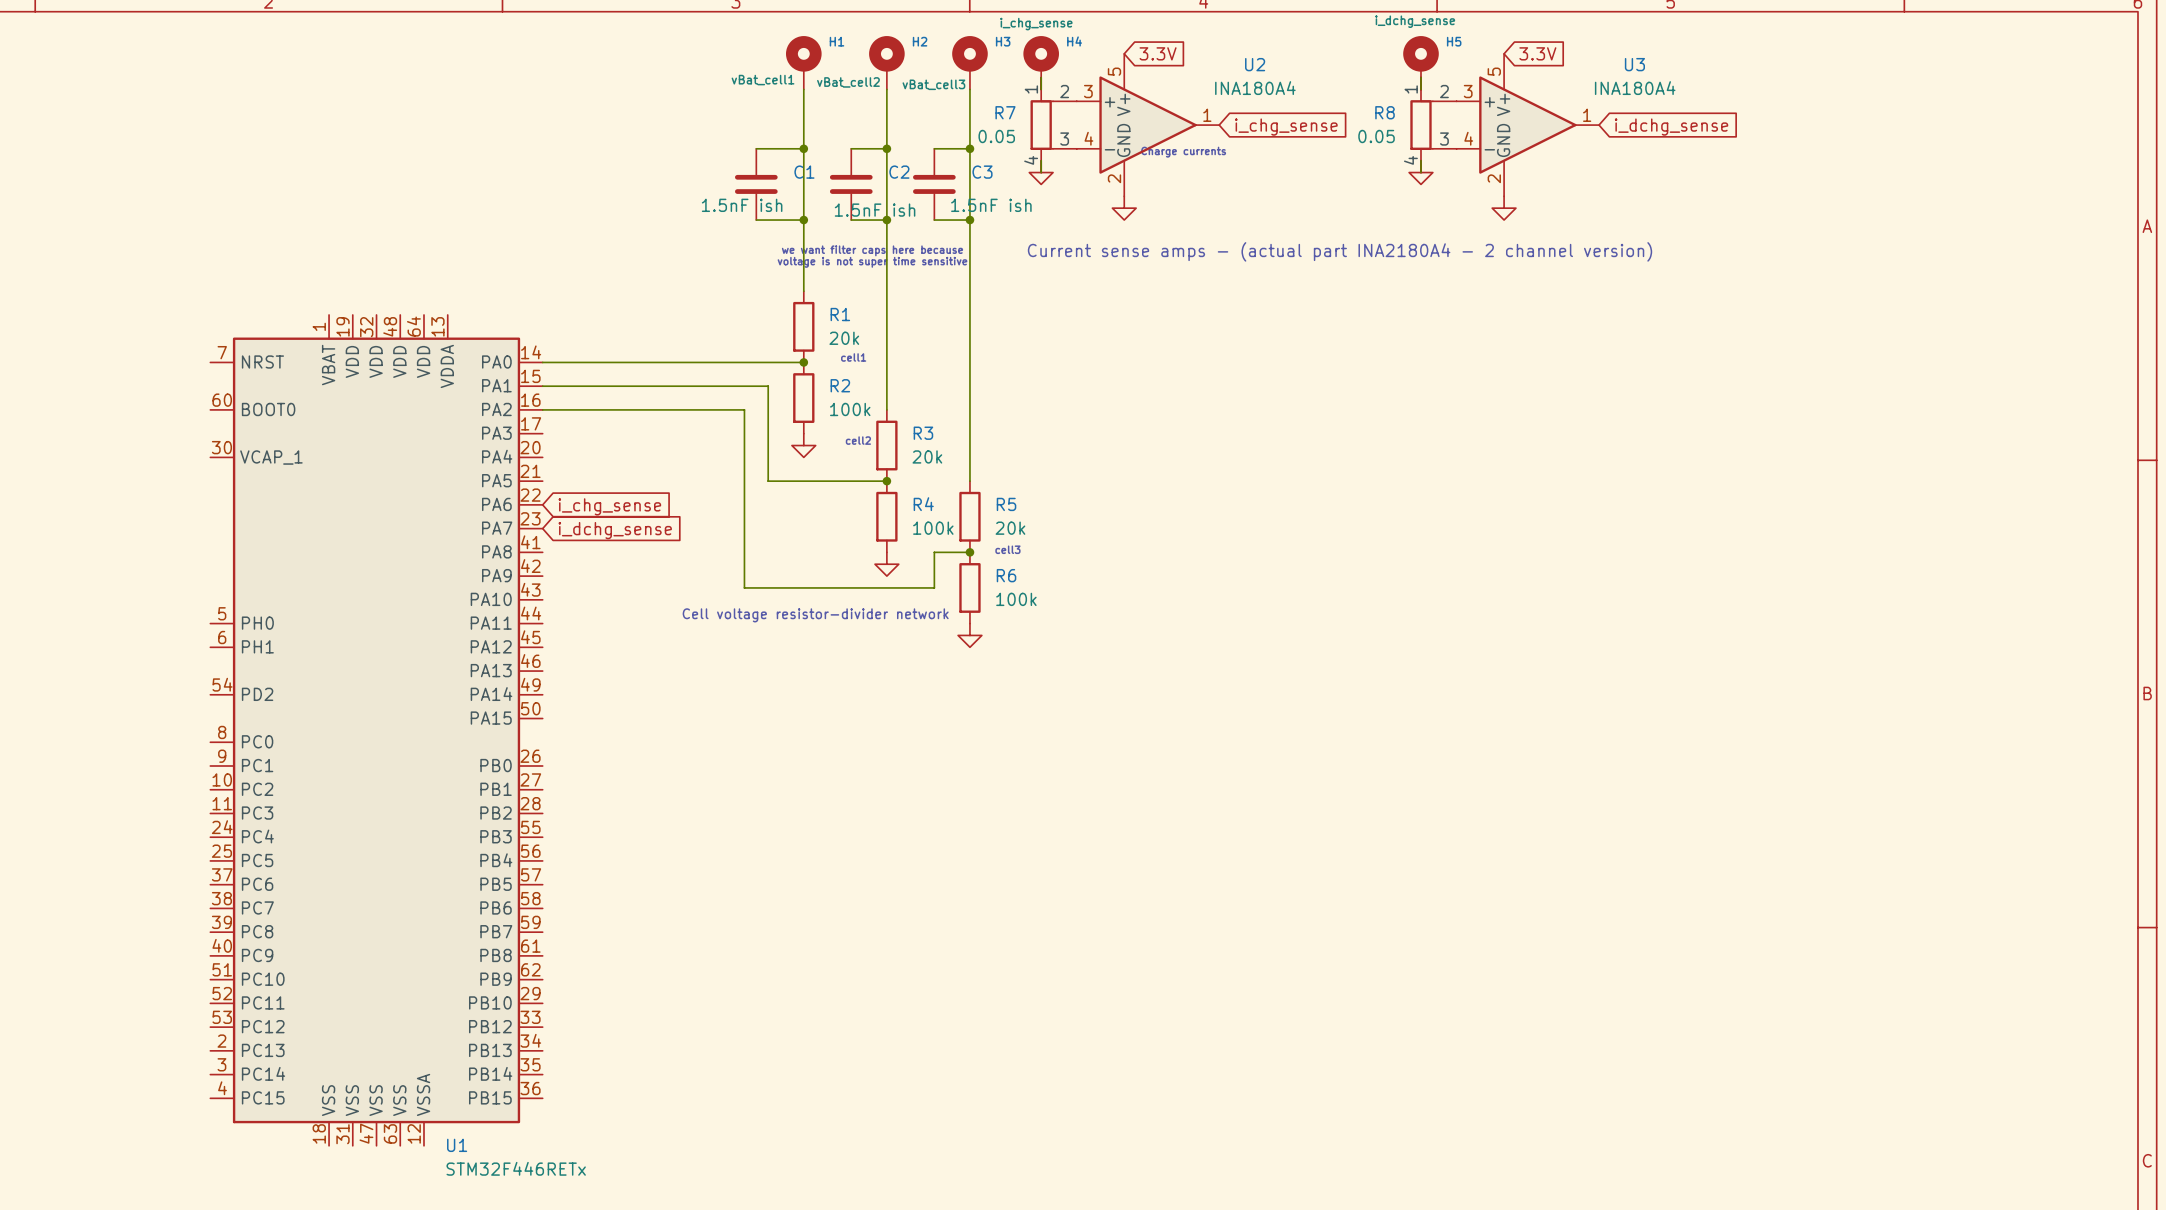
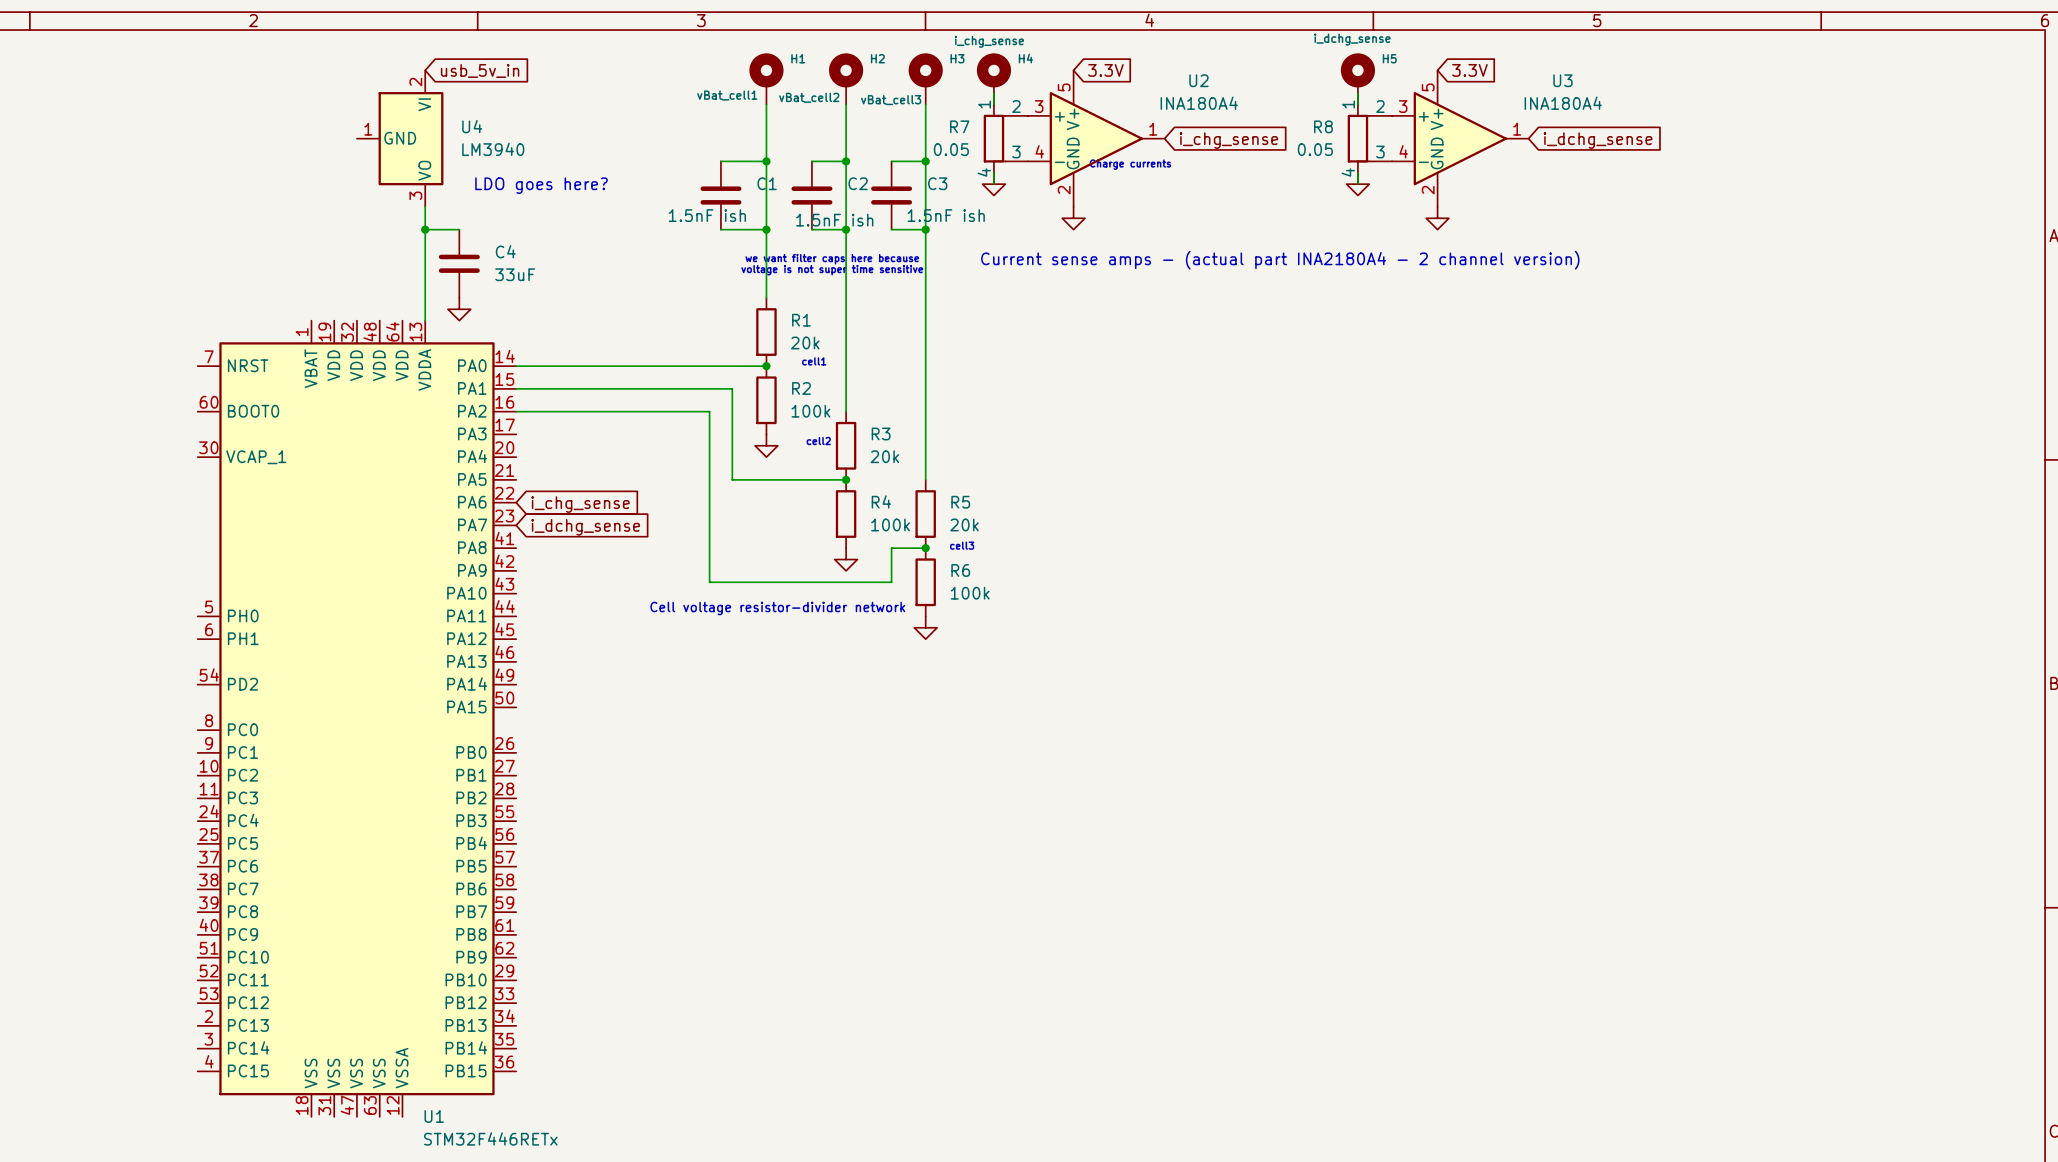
global label: none -> usb_5v_in (480, 70)
U4: none -> LM3940 (400, 138)
text: none -> LDO goes here? (541, 185)
wire: none -> (425, 206) (425, 320)
wire: none -> (425, 229) (459, 229)
junction: none -> (425, 229)
C4: none -> 33uF (459, 263)
power symbol: none -> (459, 309)

